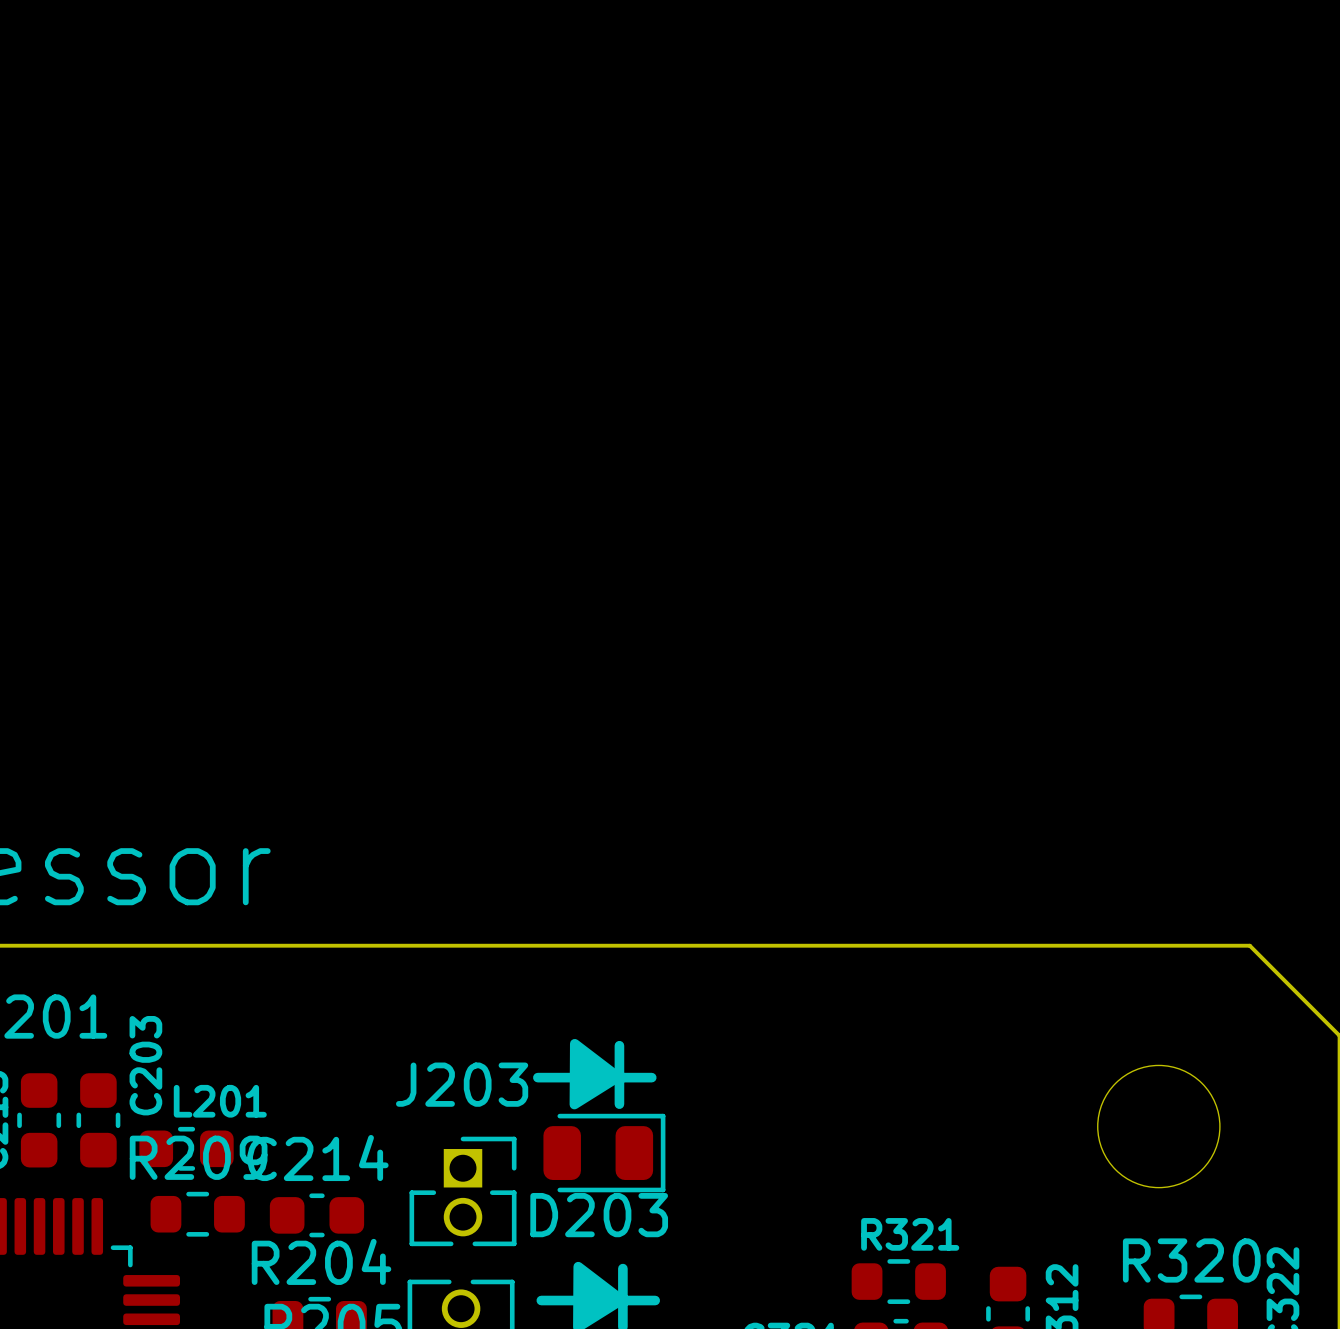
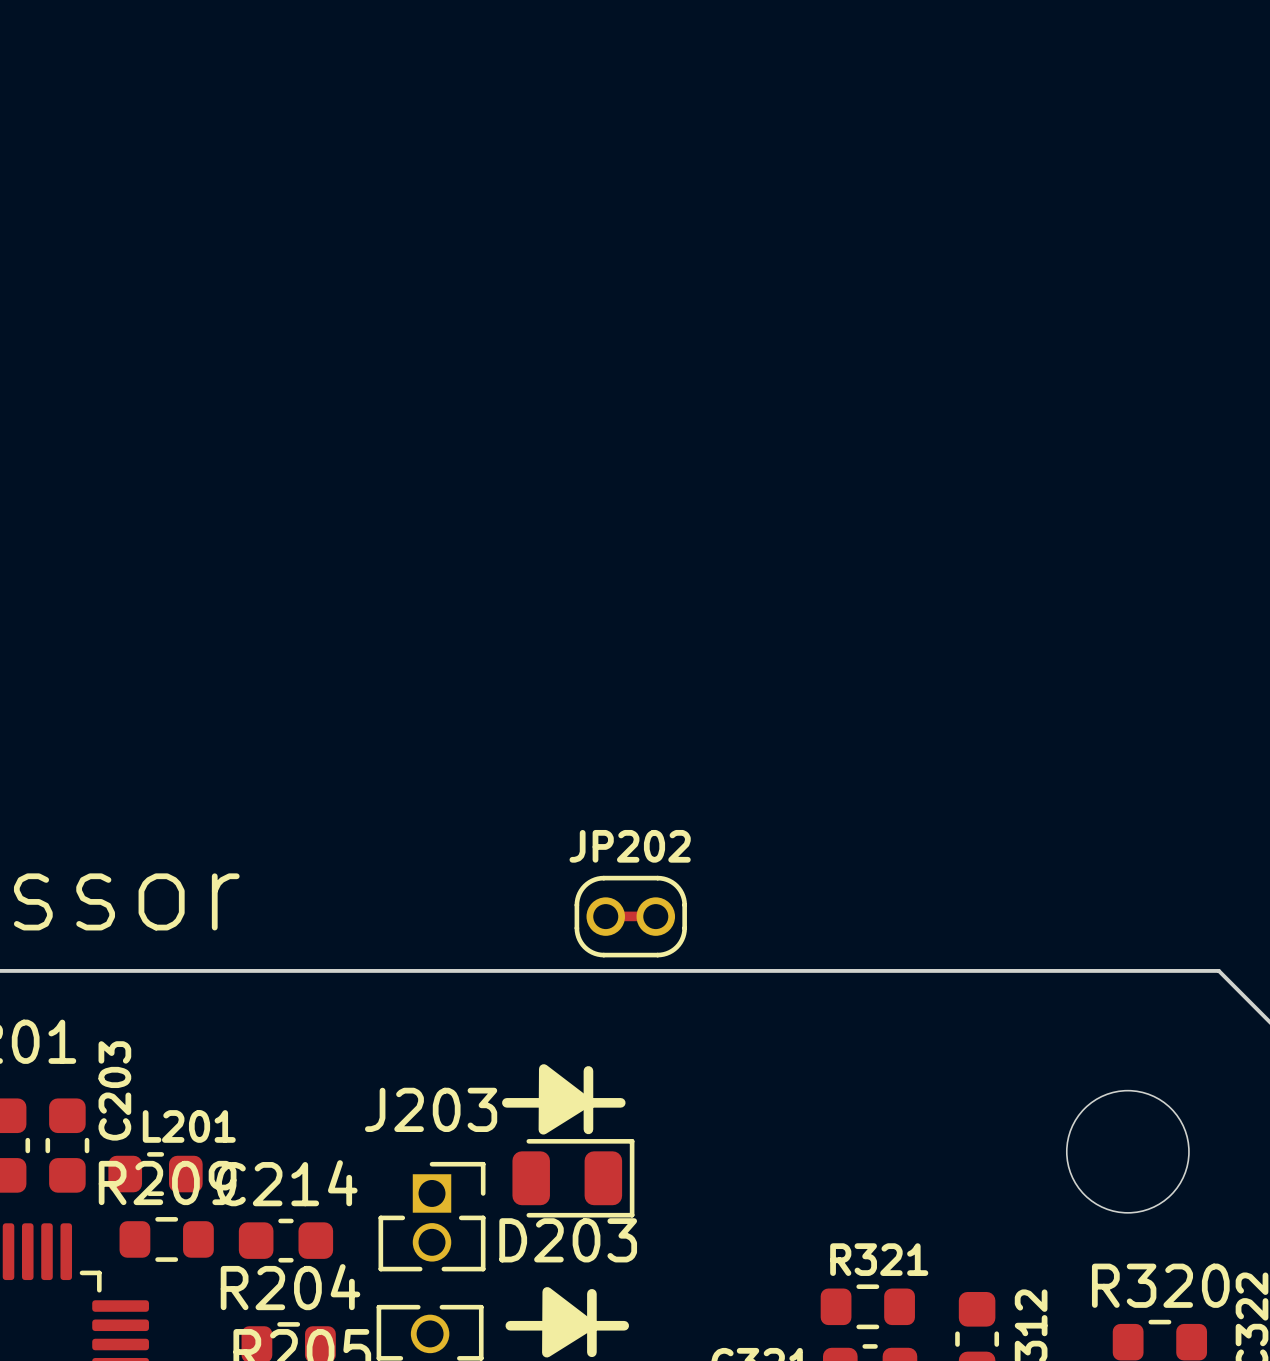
JP202: none -> (630, 916)

